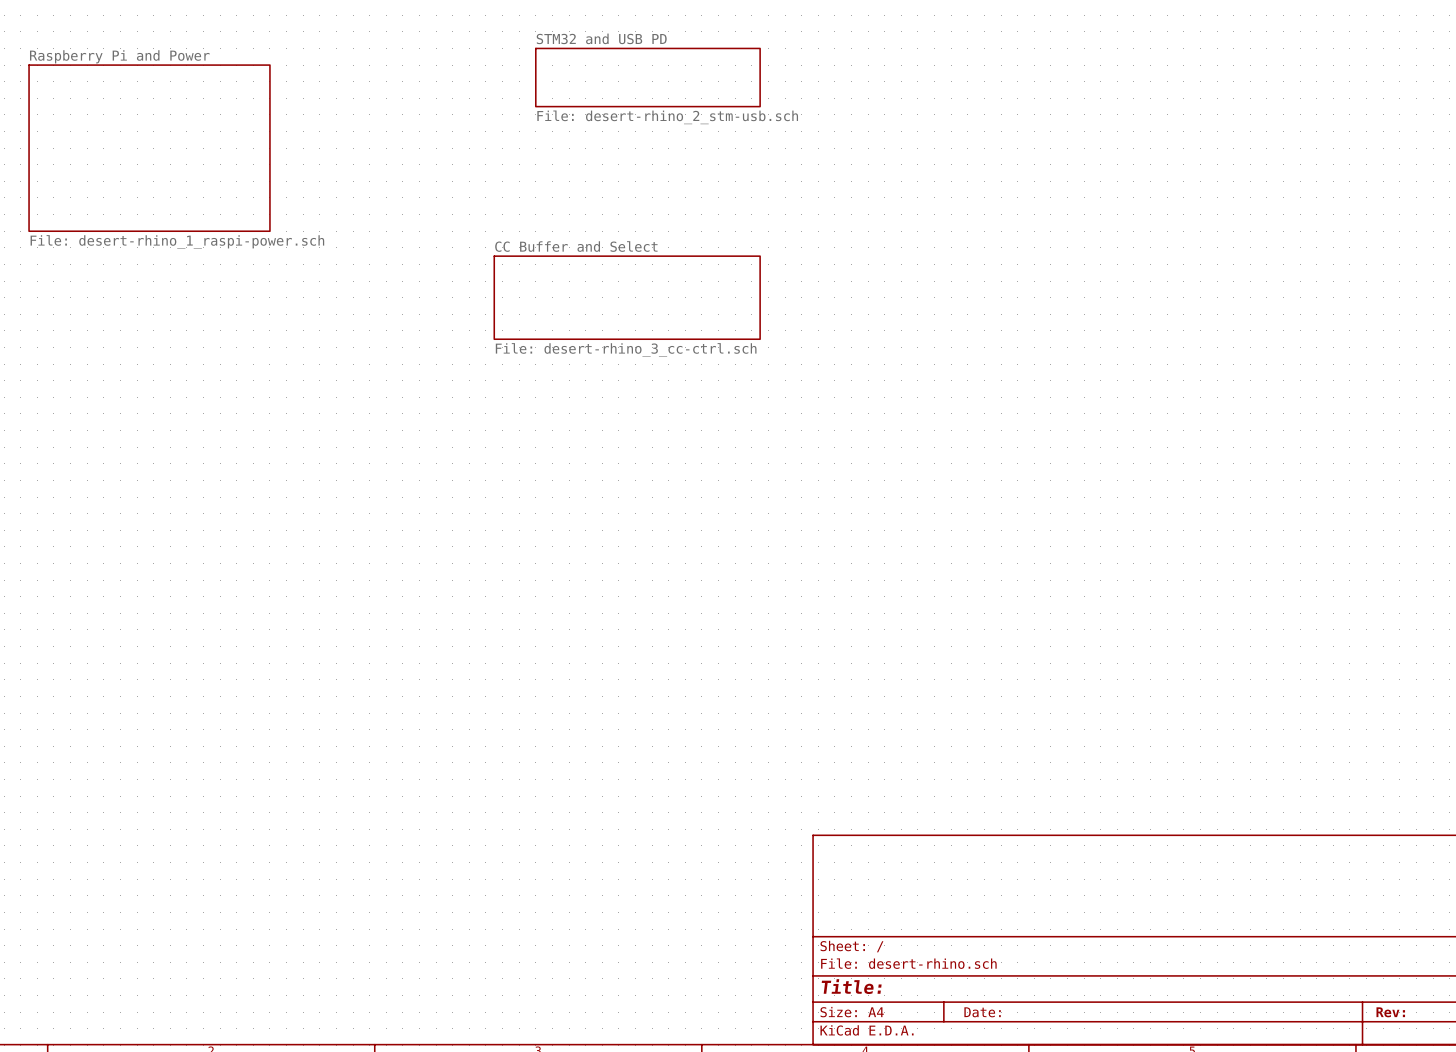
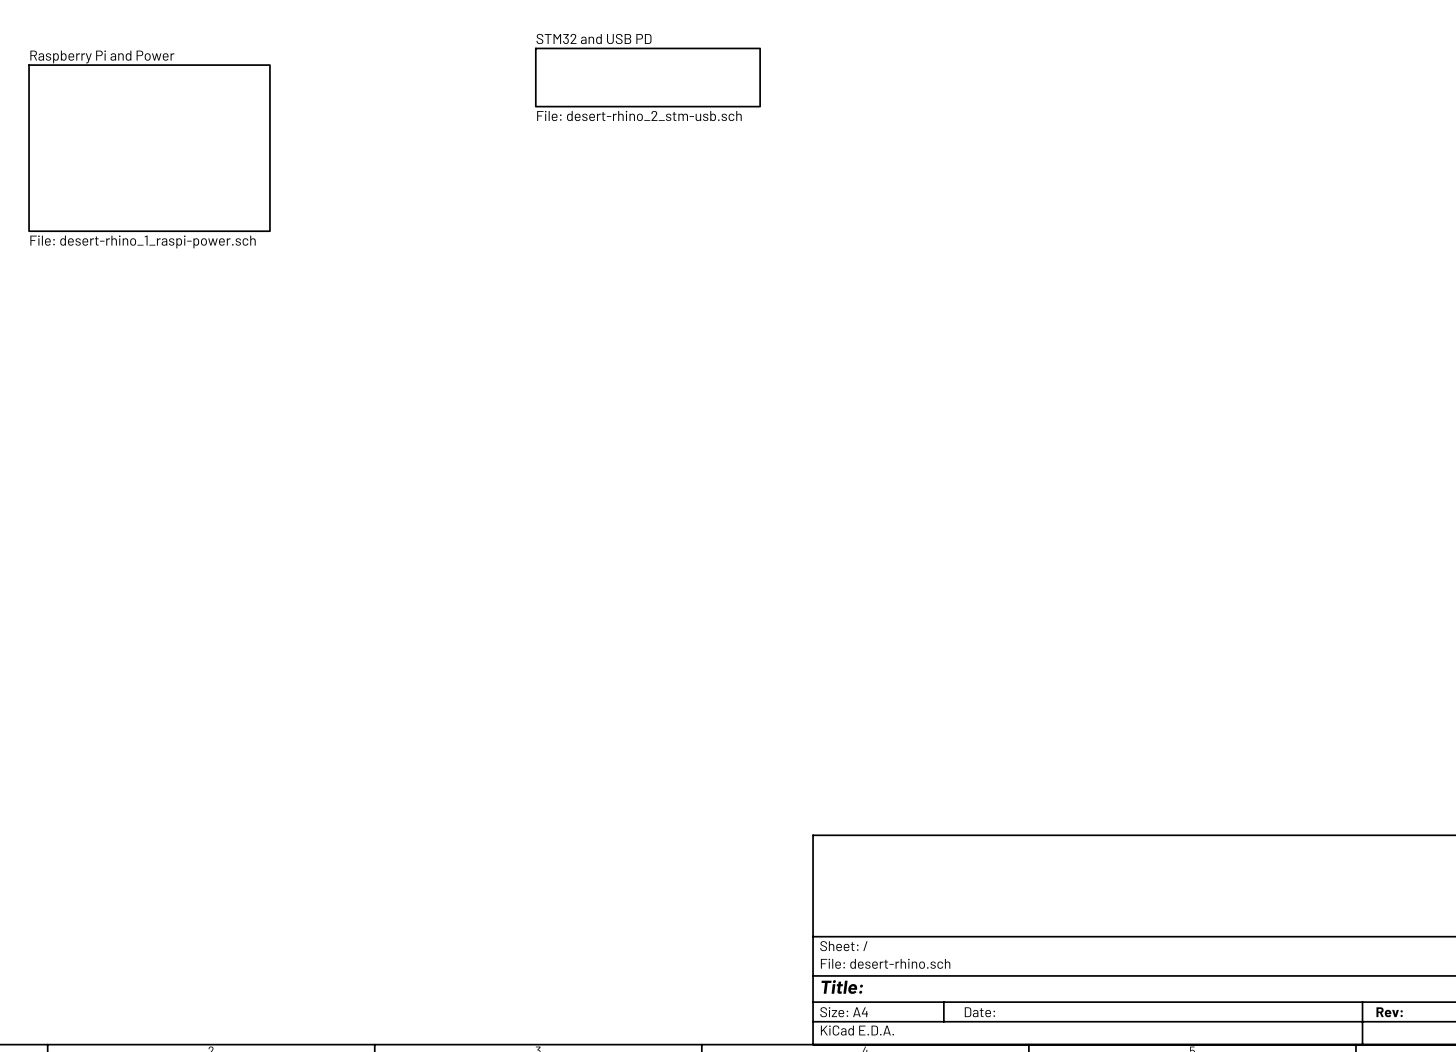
sheet CC Buffer and Select: File: desert-rhino_3_cc-ctrl.sch (627, 297) -> none

